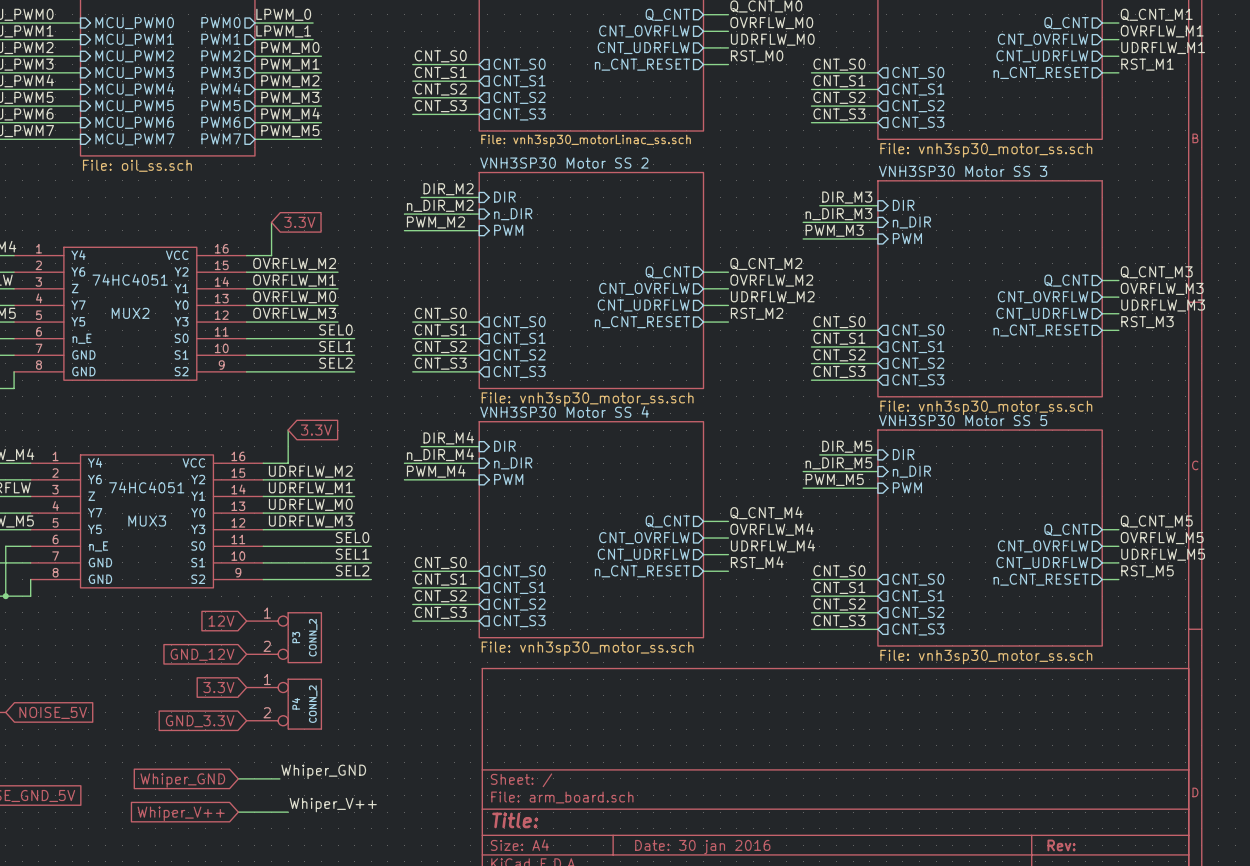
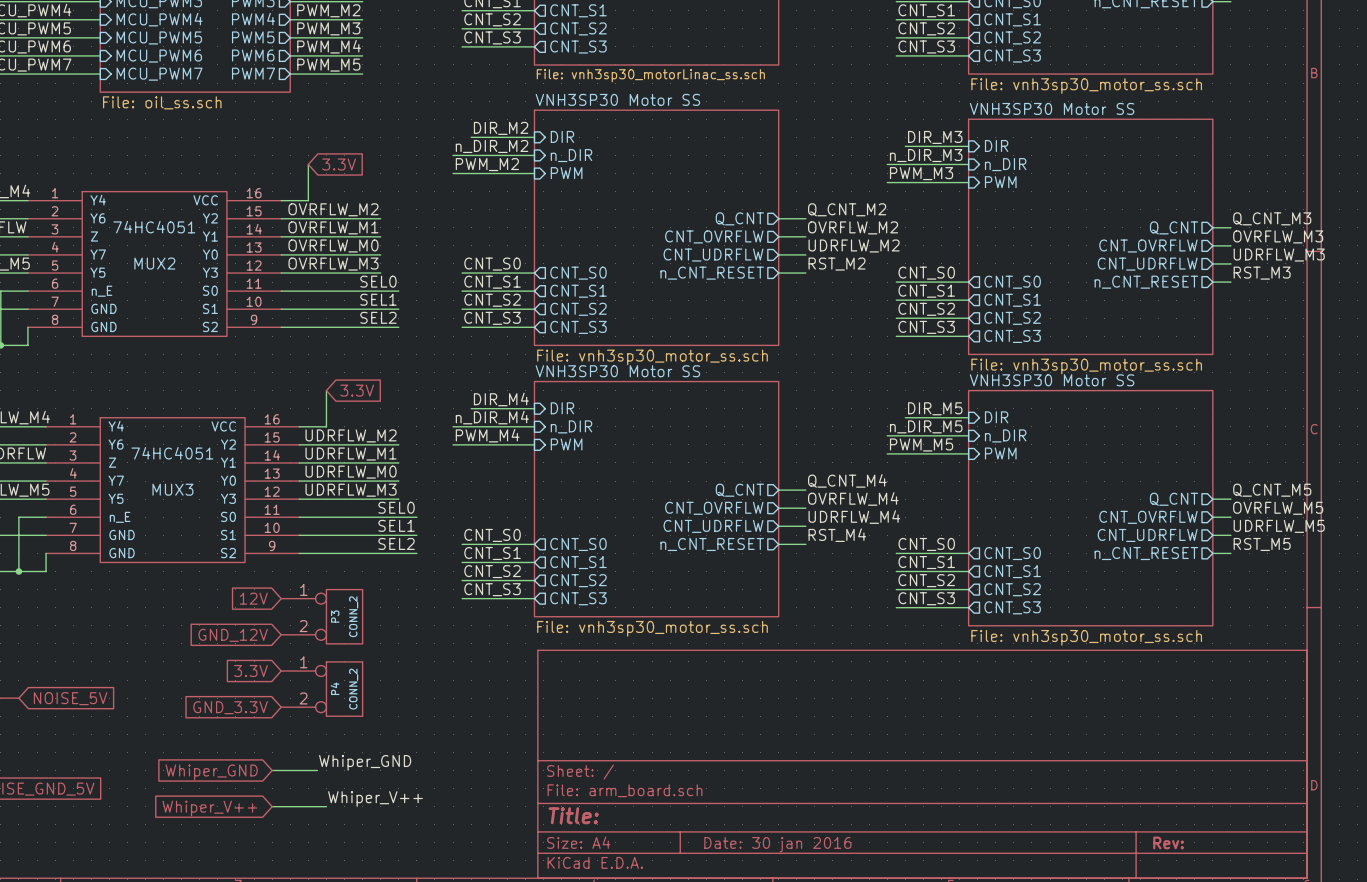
sheet VNH3SP30 Motor SS 2 name: VNH3SP30 Motor SS 2 (564, 163) -> VNH3SP30 Motor SS (617, 99)
sheet VNH3SP30 Motor SS 3 name: VNH3SP30 Motor SS 3 (963, 171) -> VNH3SP30 Motor SS (1052, 108)
sheet VNH3SP30 Motor SS 4 name: VNH3SP30 Motor SS 4 (564, 412) -> VNH3SP30 Motor SS (617, 371)
sheet VNH3SP30 Motor SS 5 name: VNH3SP30 Motor SS 5 (963, 420) -> VNH3SP30 Motor SS (1052, 380)

